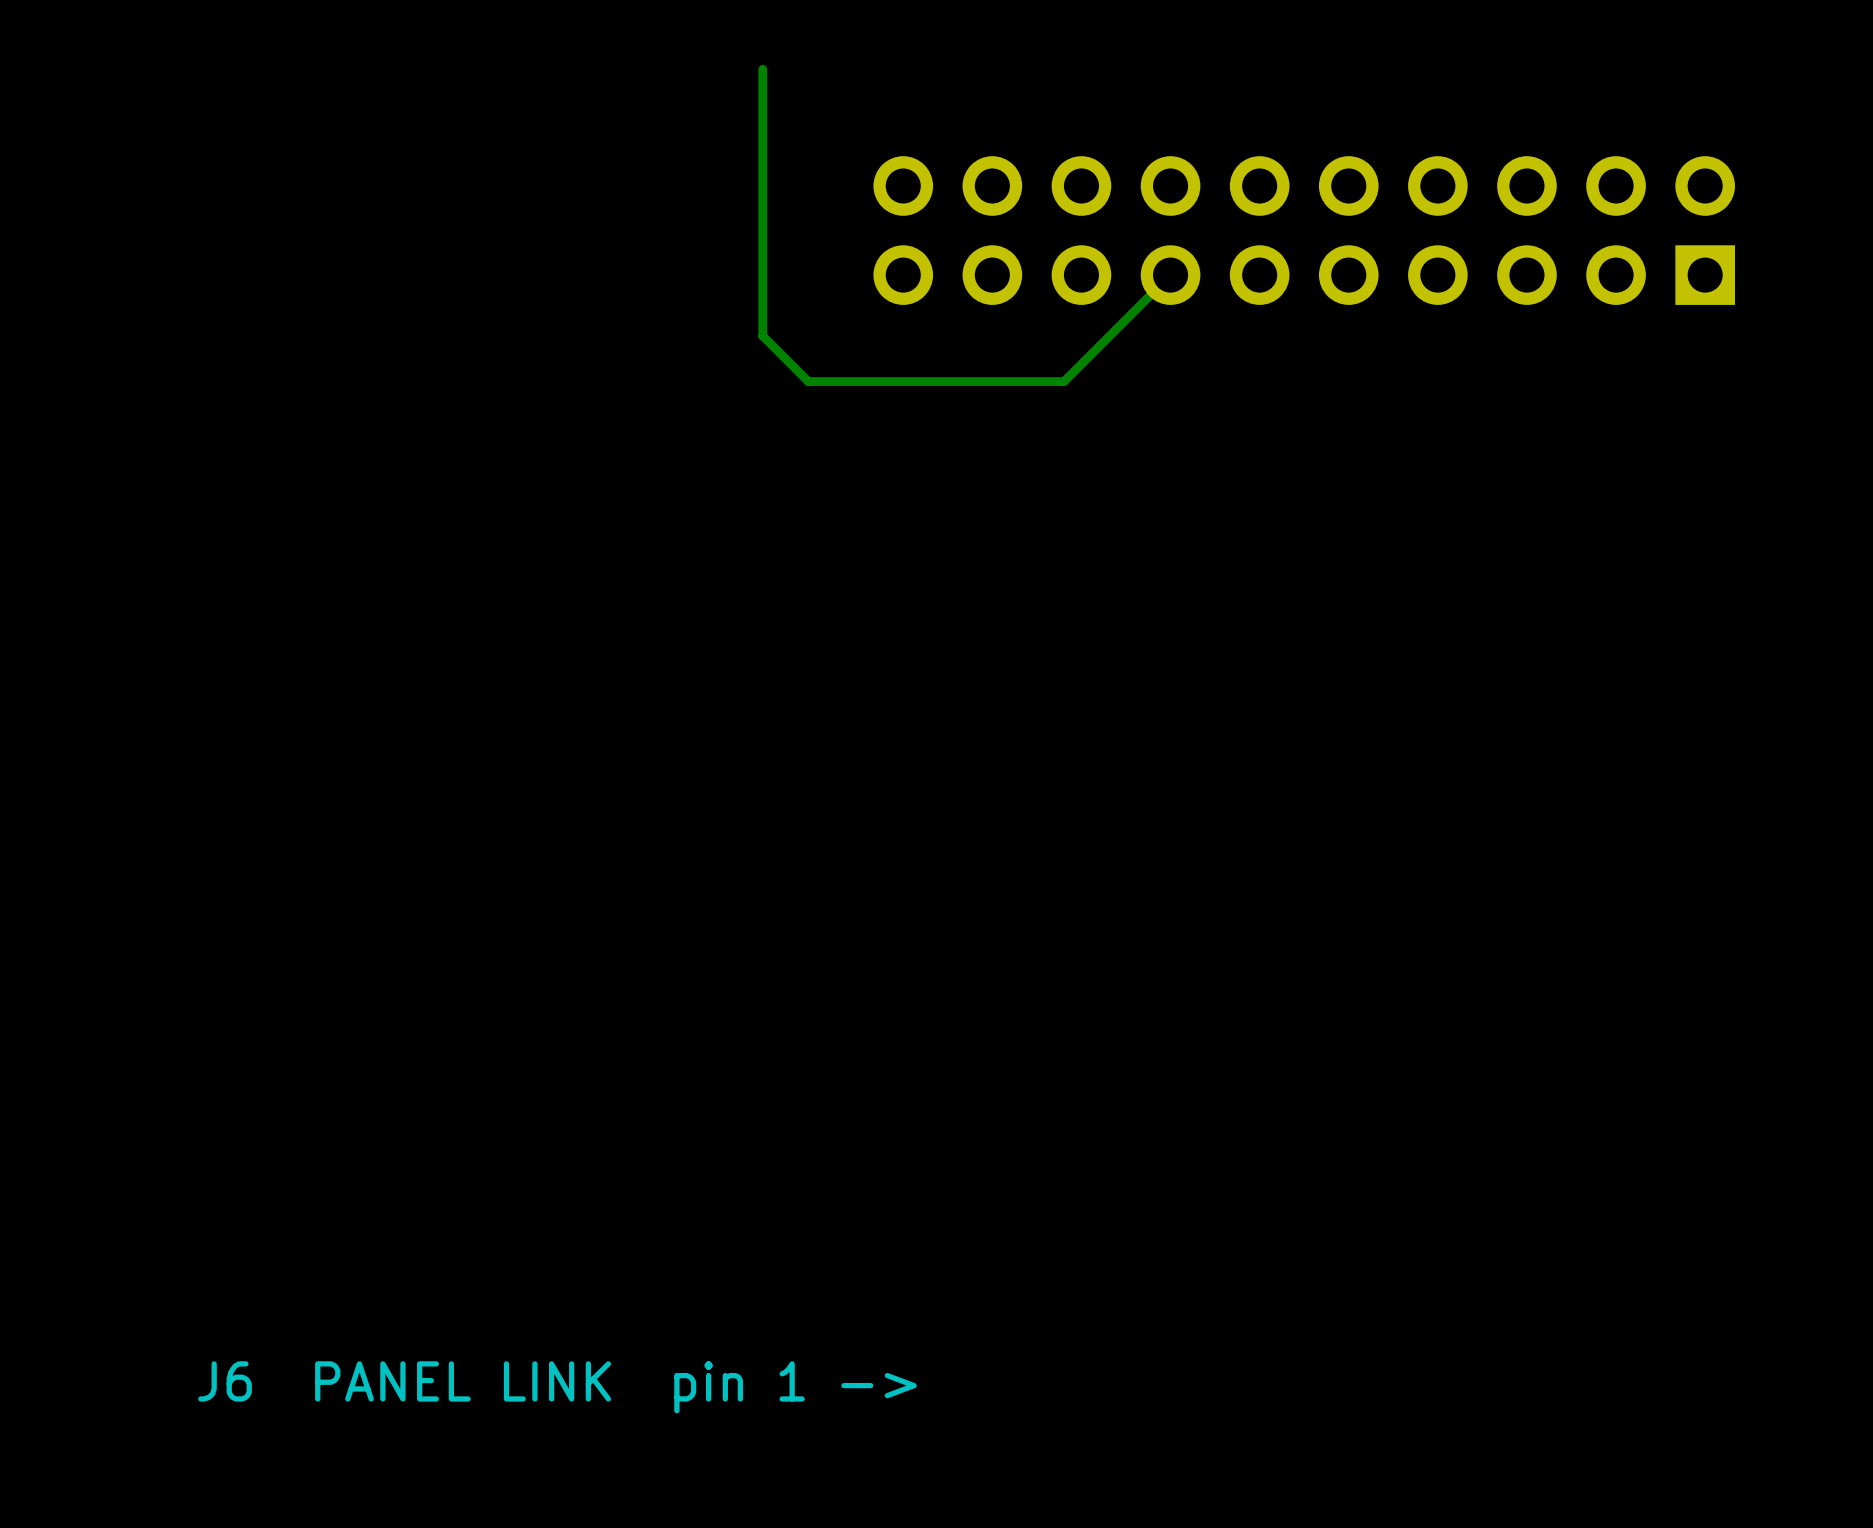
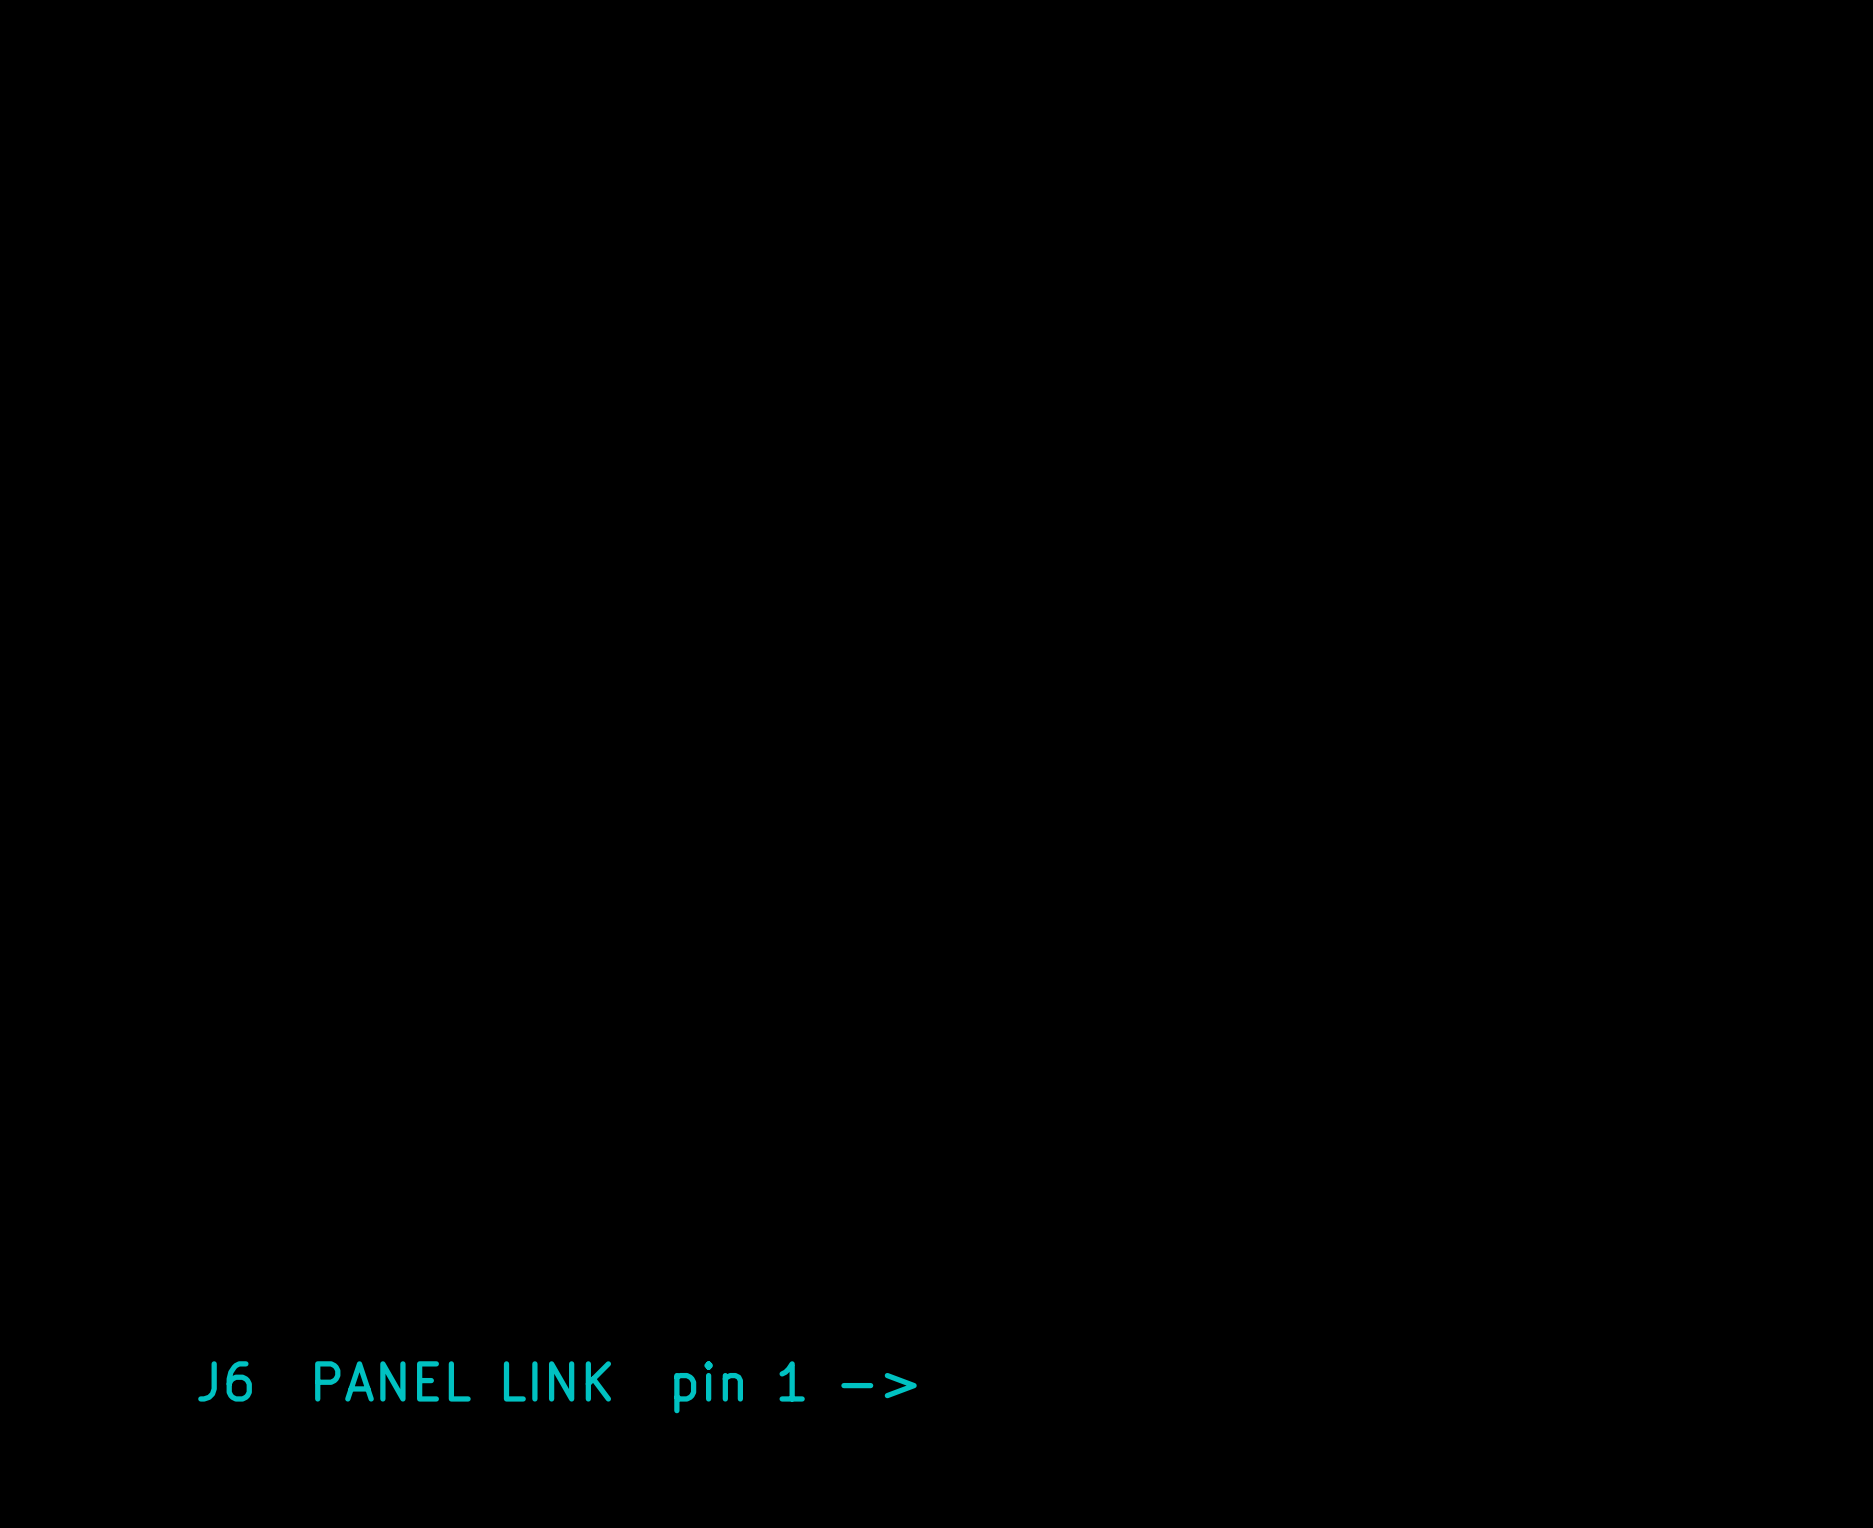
track: (762, 69) (762, 335) (808, 381) (1064, 381) (1170, 275) -> none
part: (1304, 230) -> none

